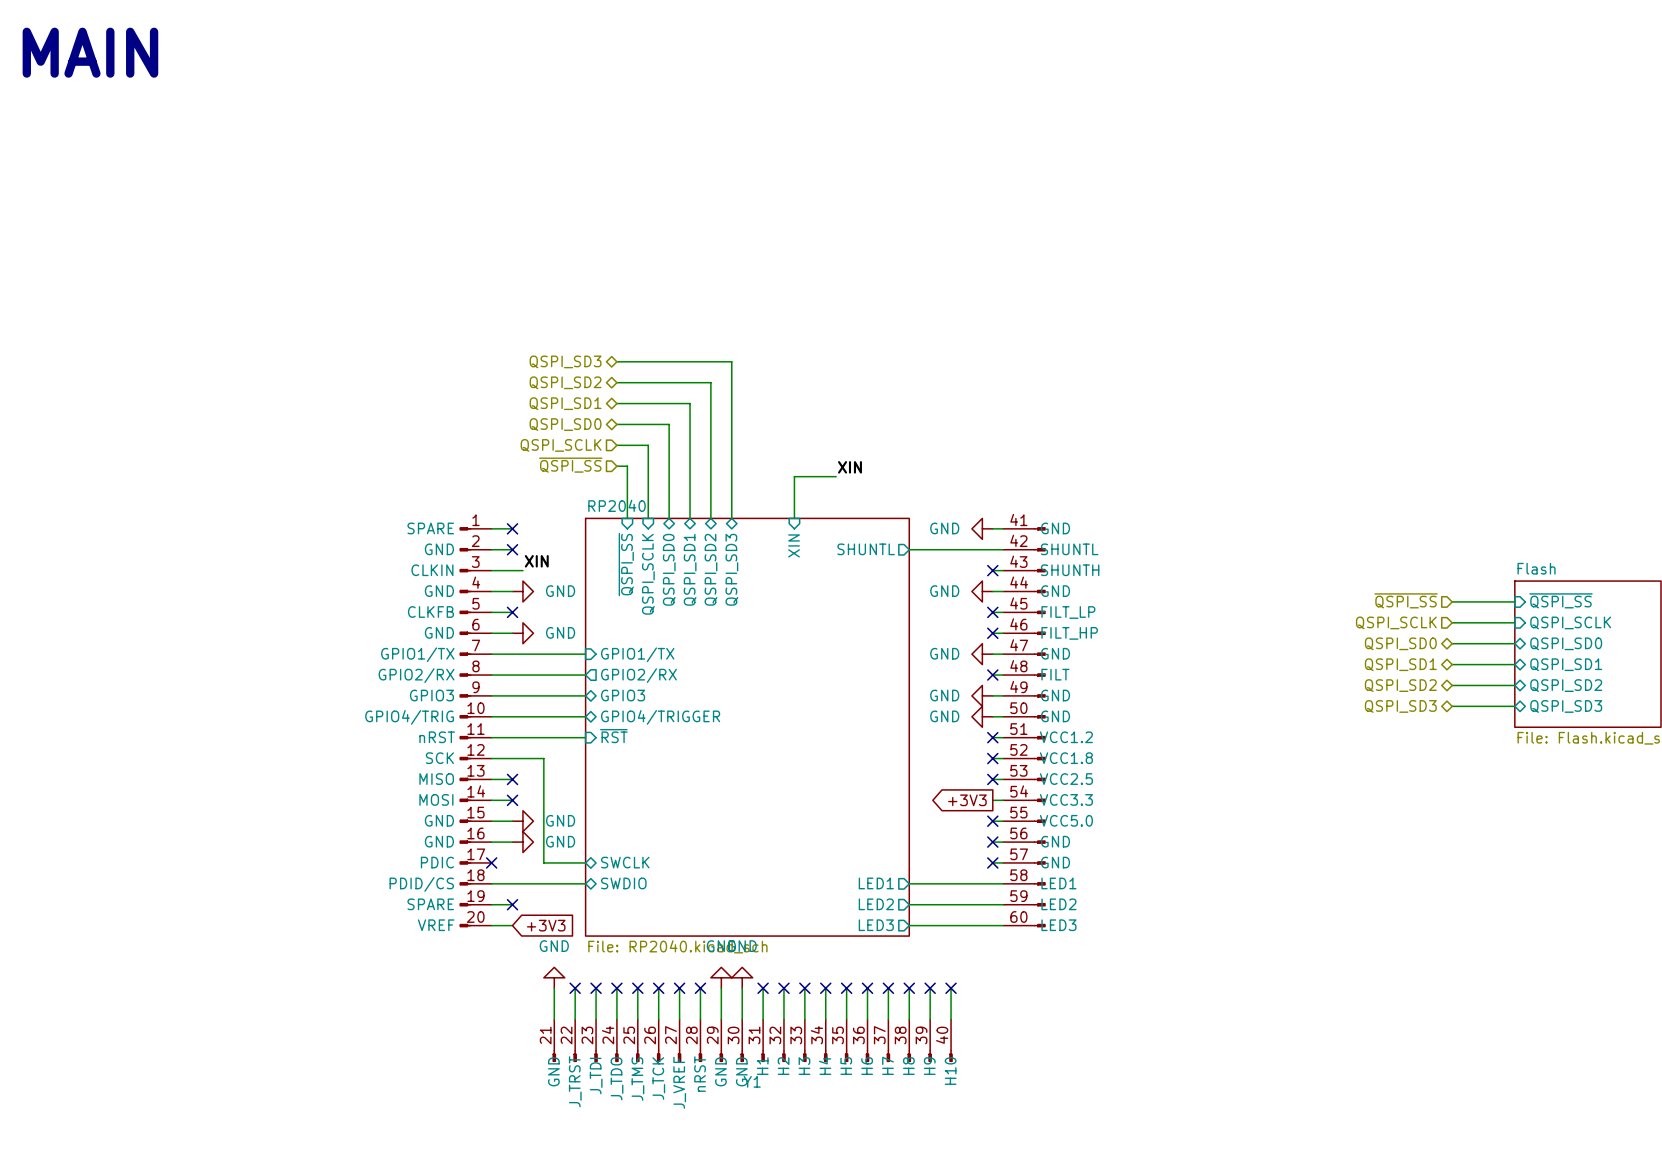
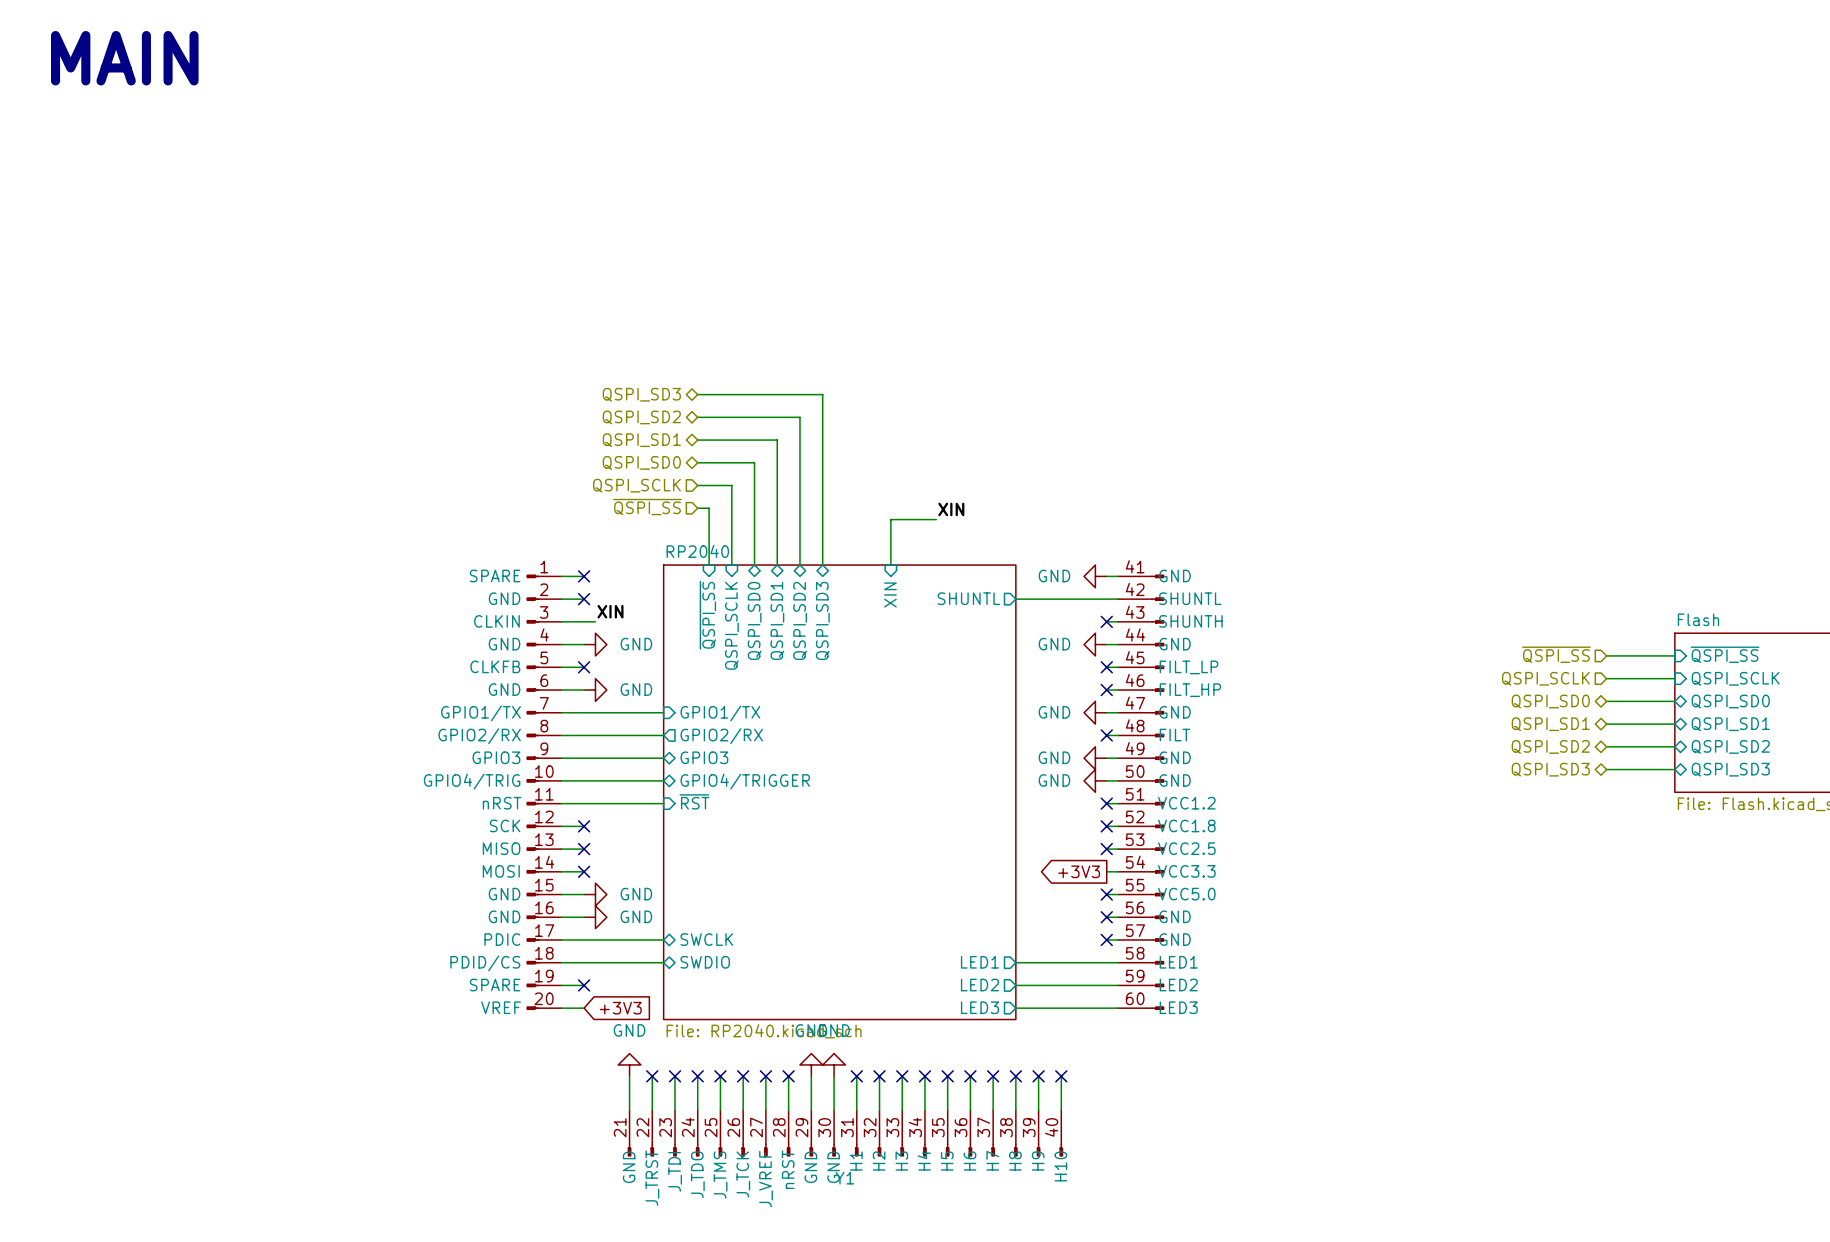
wire: (512, 758) (543, 758) (543, 862) -> (561, 939) (618, 939)
no-connect mark: none -> (584, 826)
no-connect mark: (491, 862) -> none

